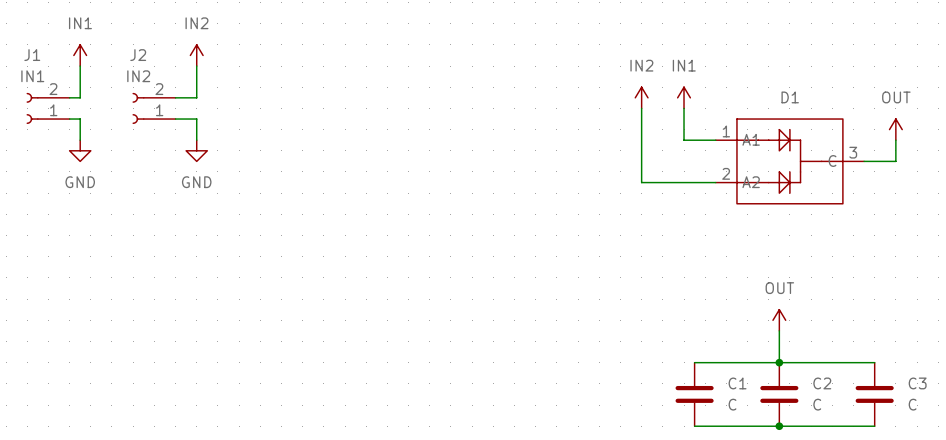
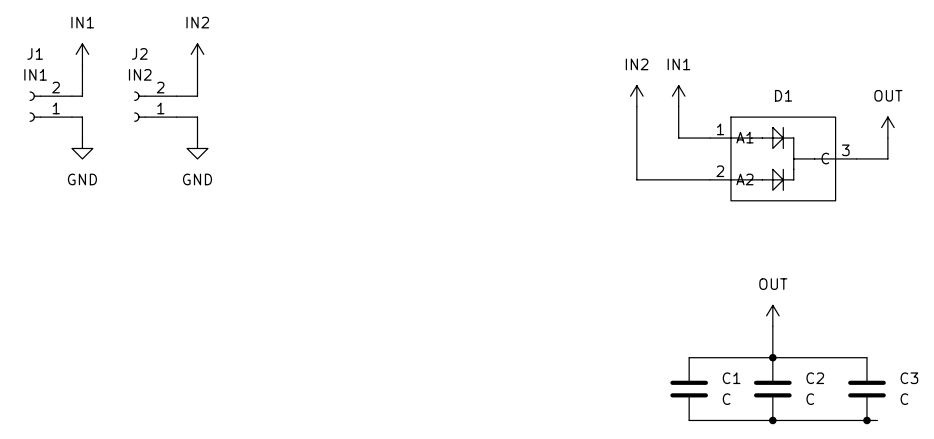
wire: none -> (866, 420) (877, 420)
junction: none -> (866, 420)

